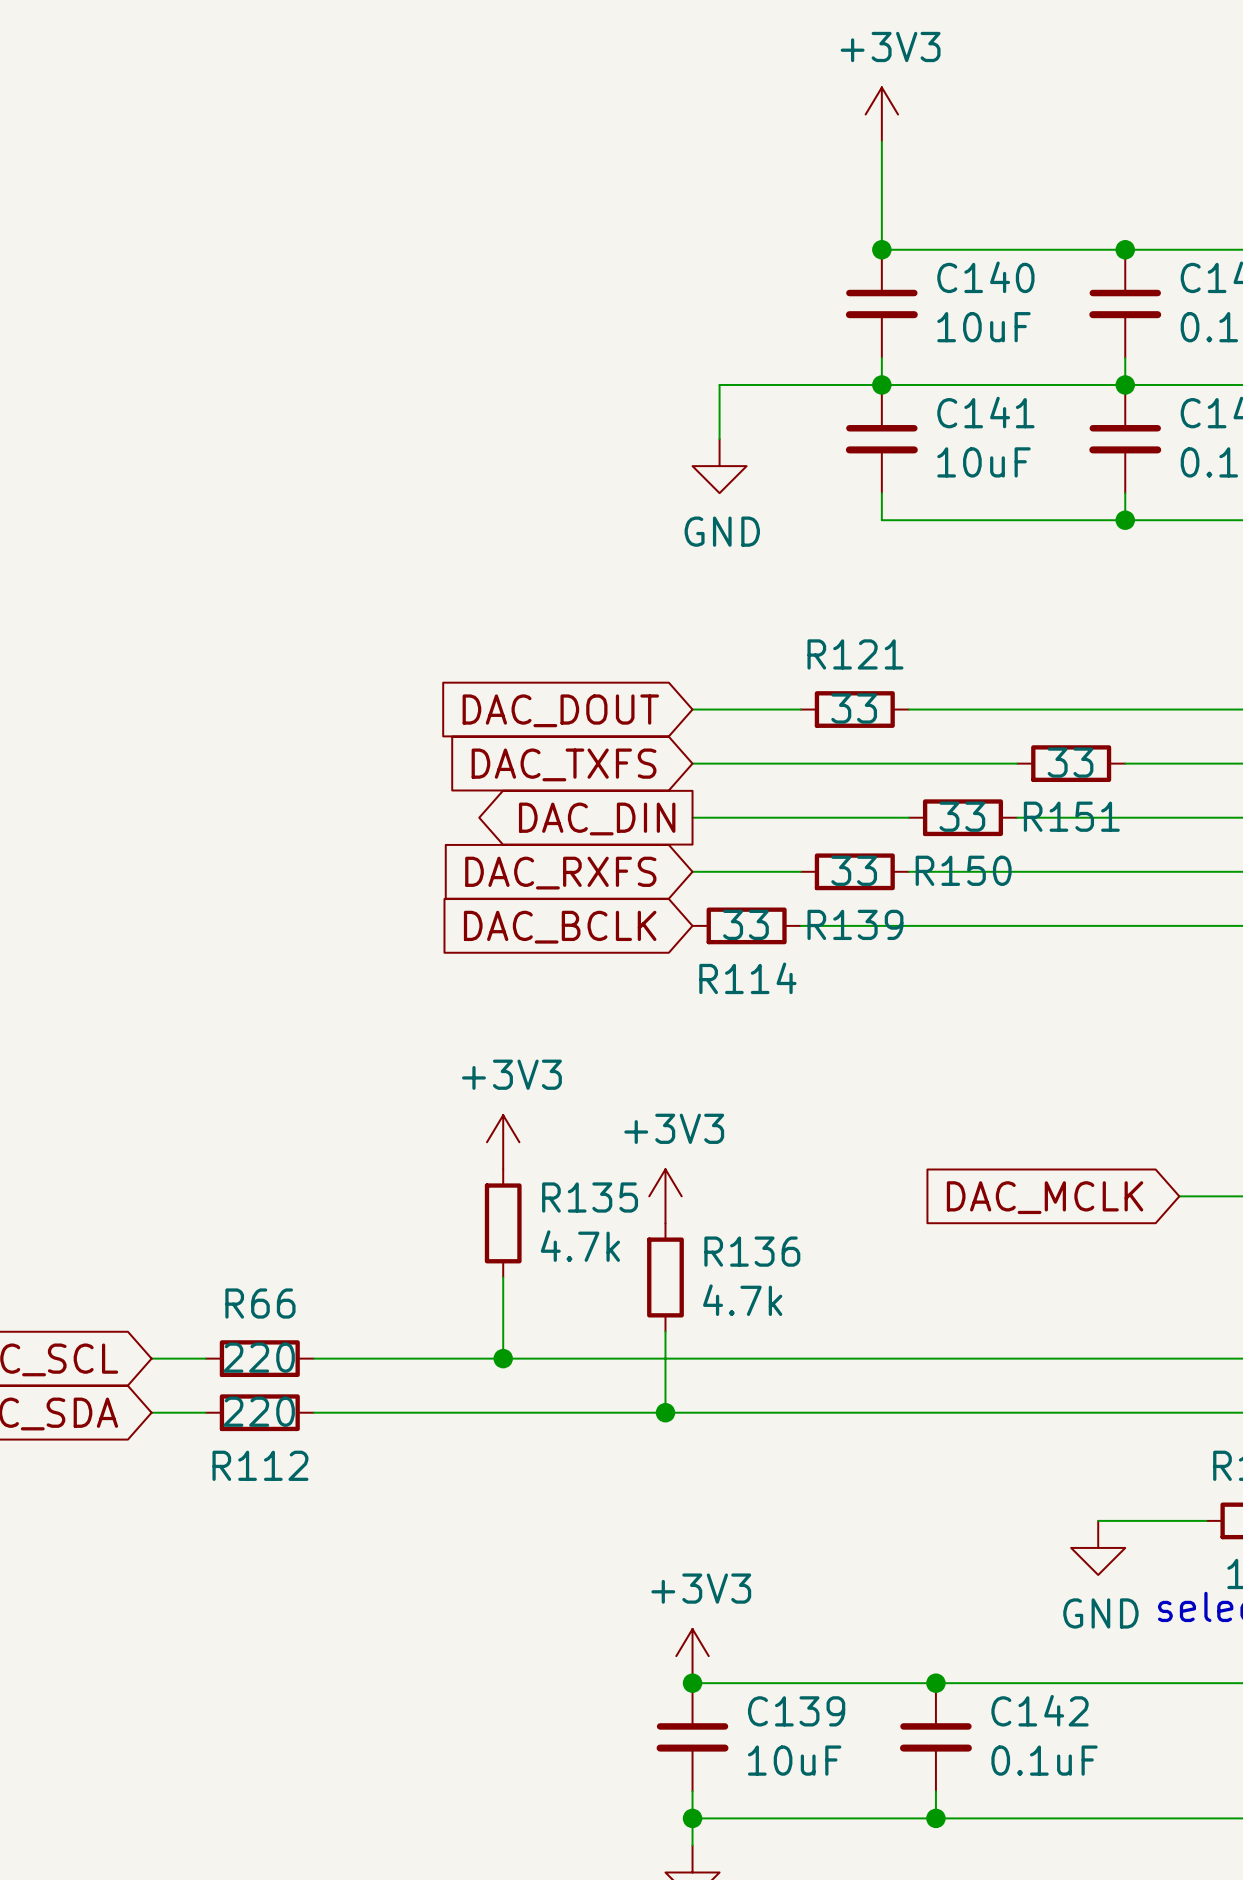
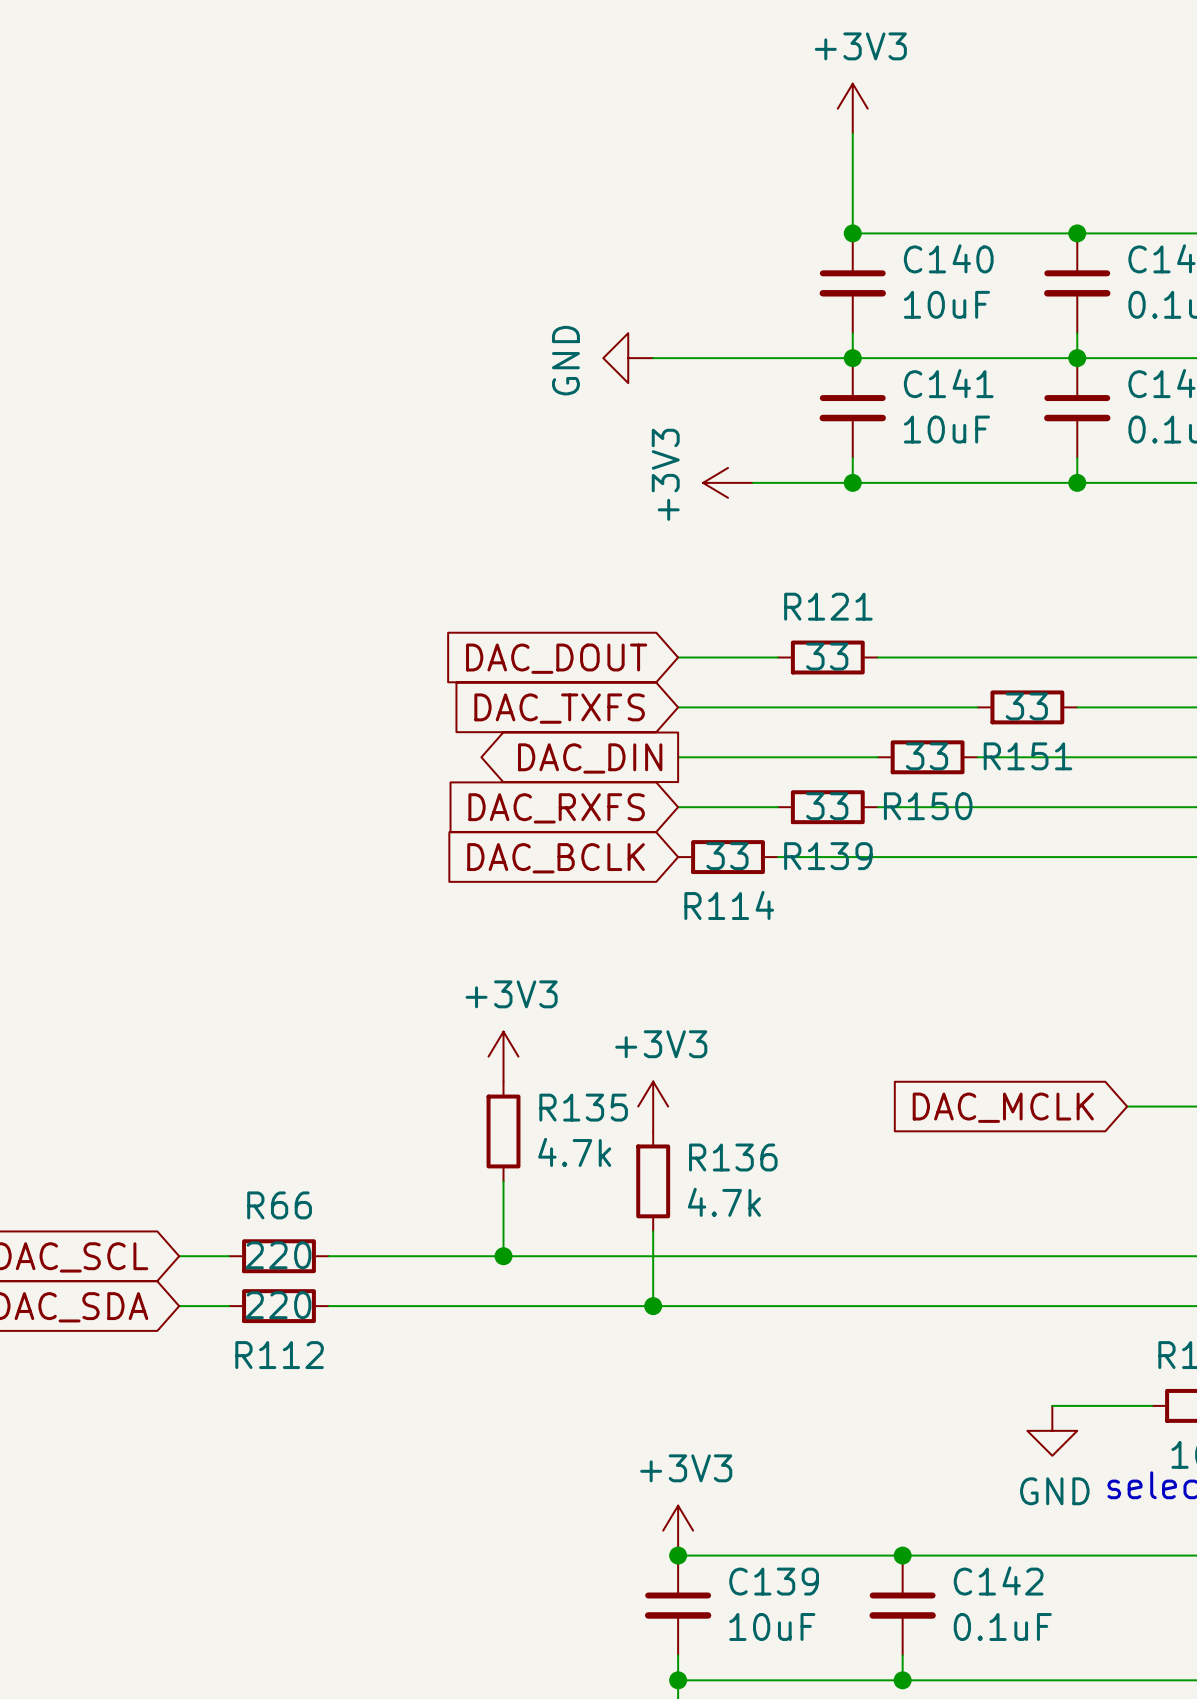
wire: (719, 384) (719, 439) -> (703, 358) (653, 358)
power symbol rotation: 0° (719, 466) -> 90° clockwise (628, 358)
power symbol position: GND (719, 466) -> GND (628, 358)
power symbol: none -> +3V3 (728, 482)
wire: none -> (752, 482) (852, 482)
junction: none -> (852, 482)

